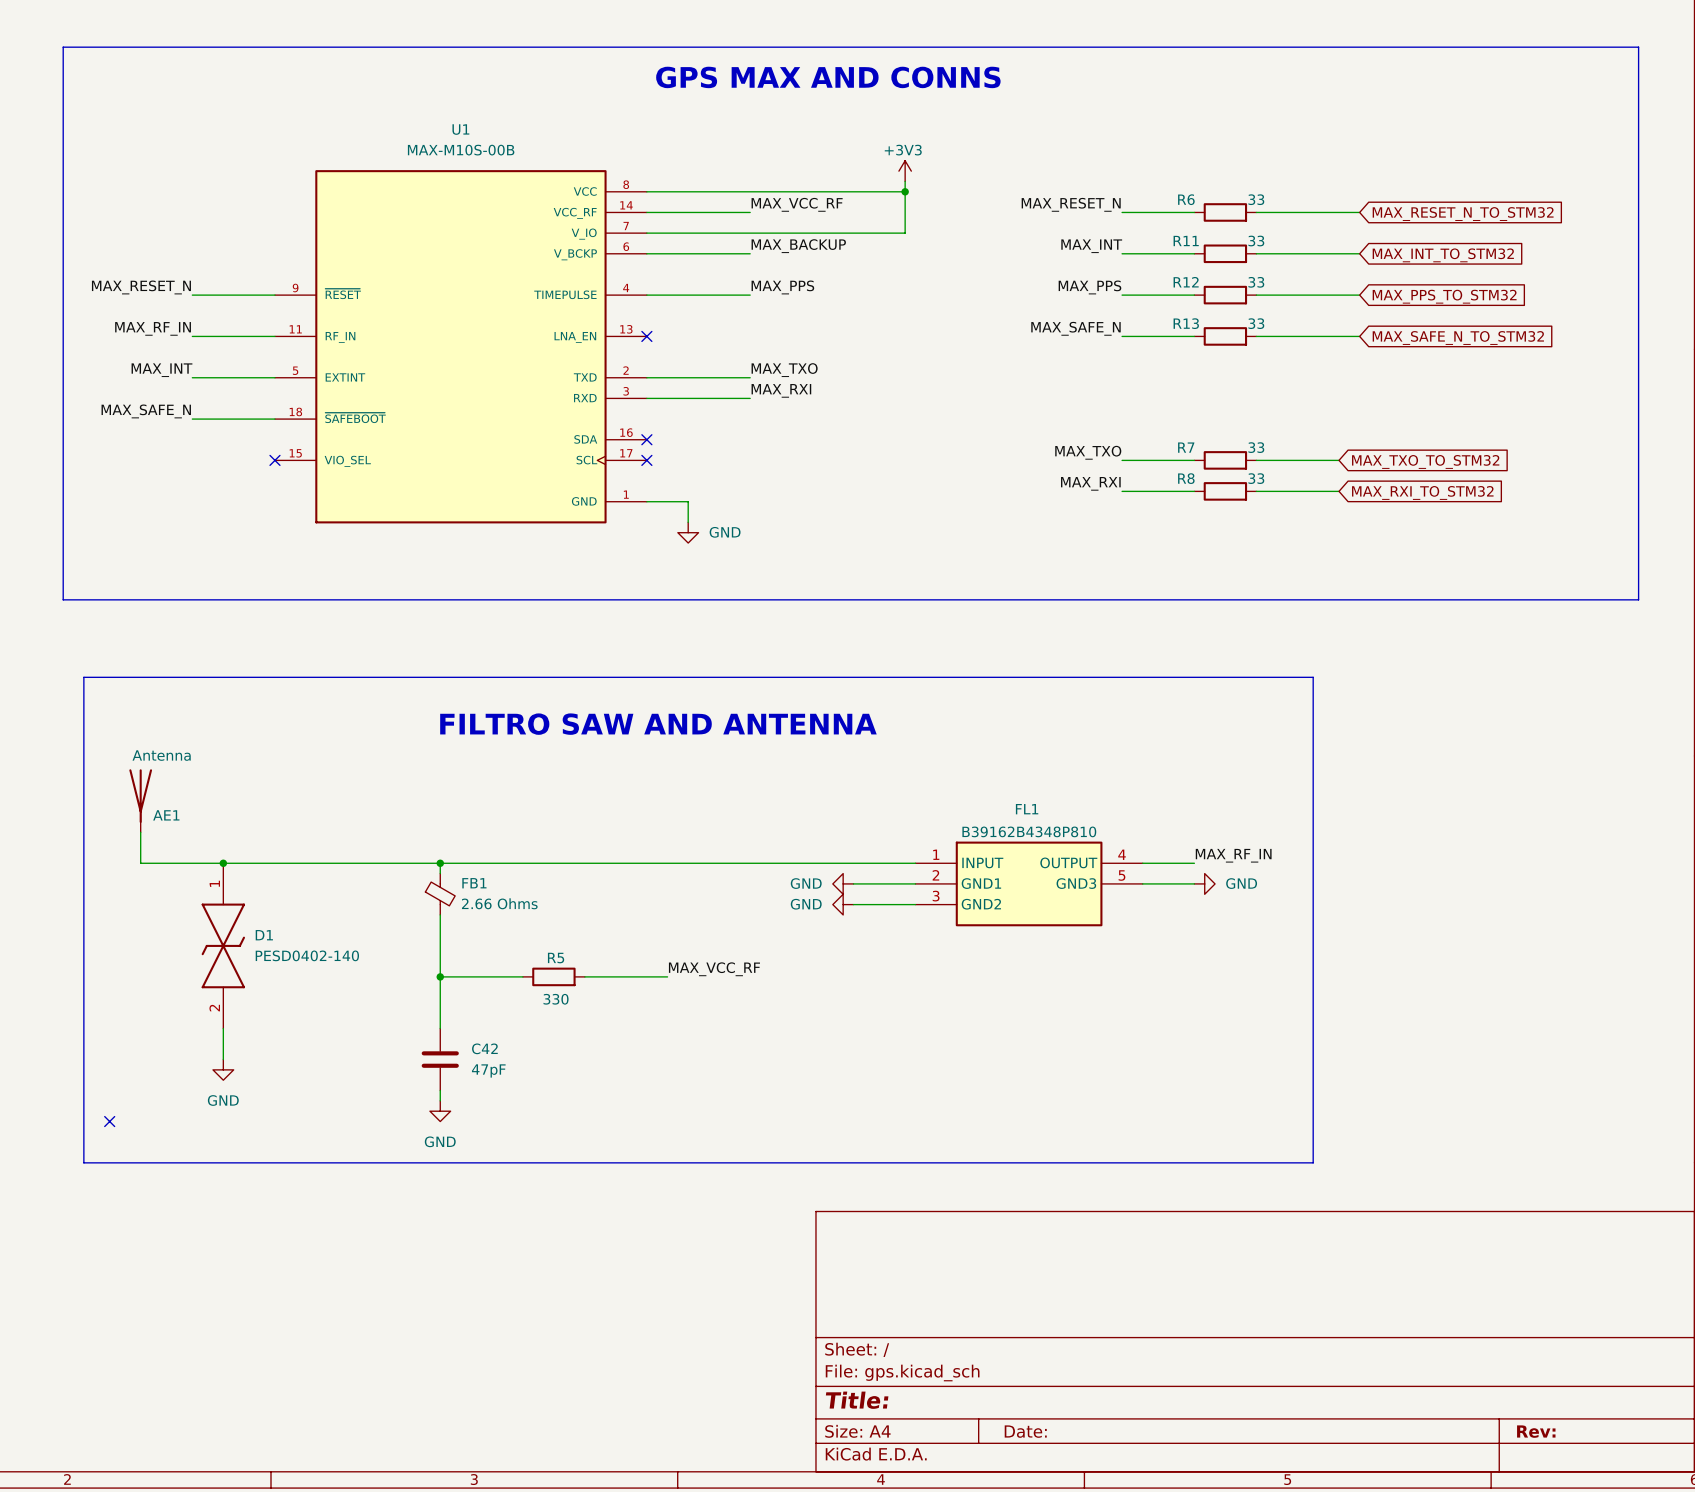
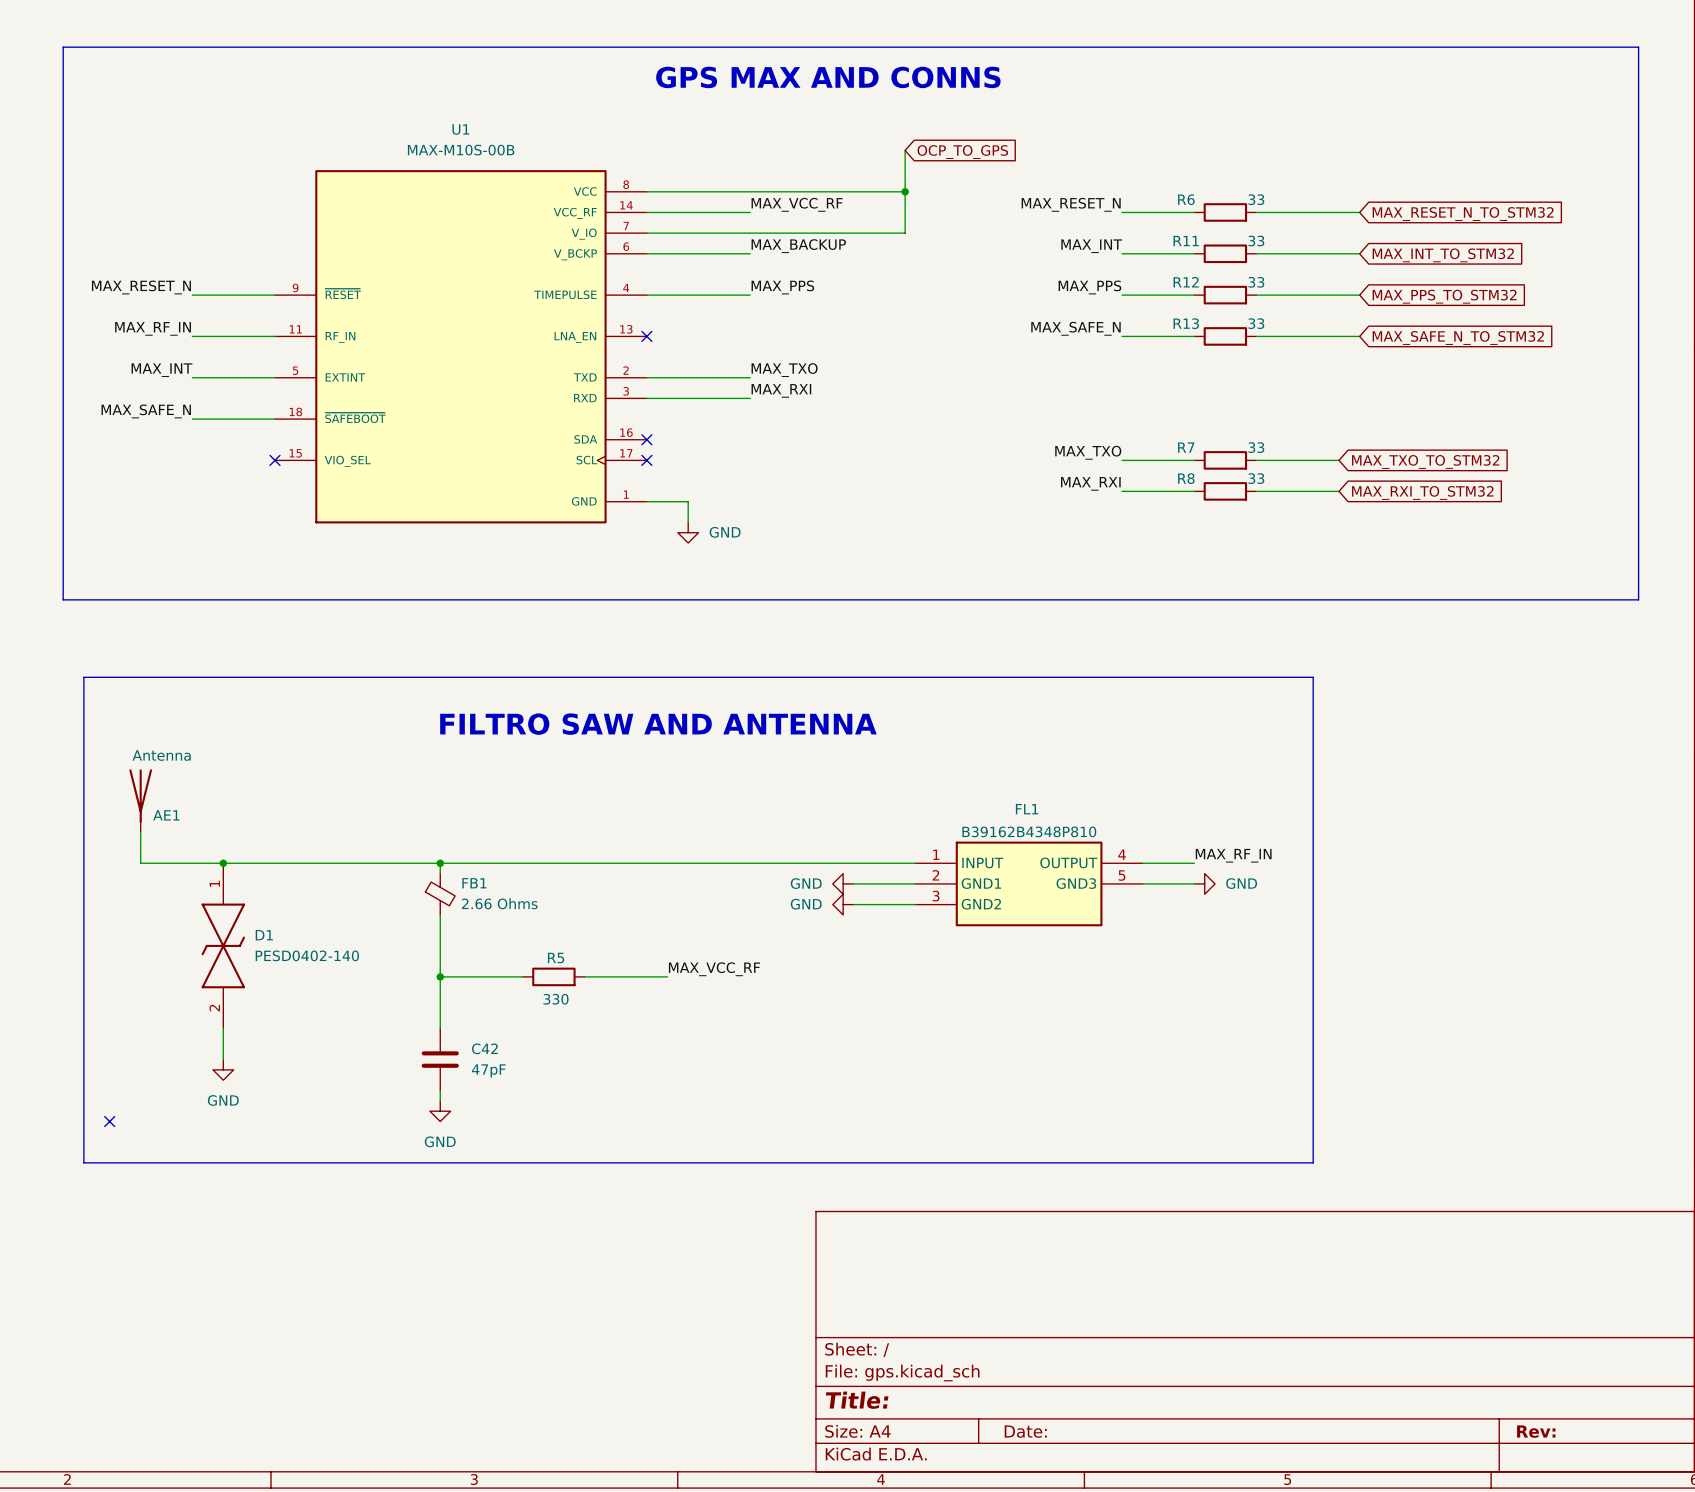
global label: none -> OCP_TO_GPS (962, 152)
power symbol: +3V3 (905, 171) -> none

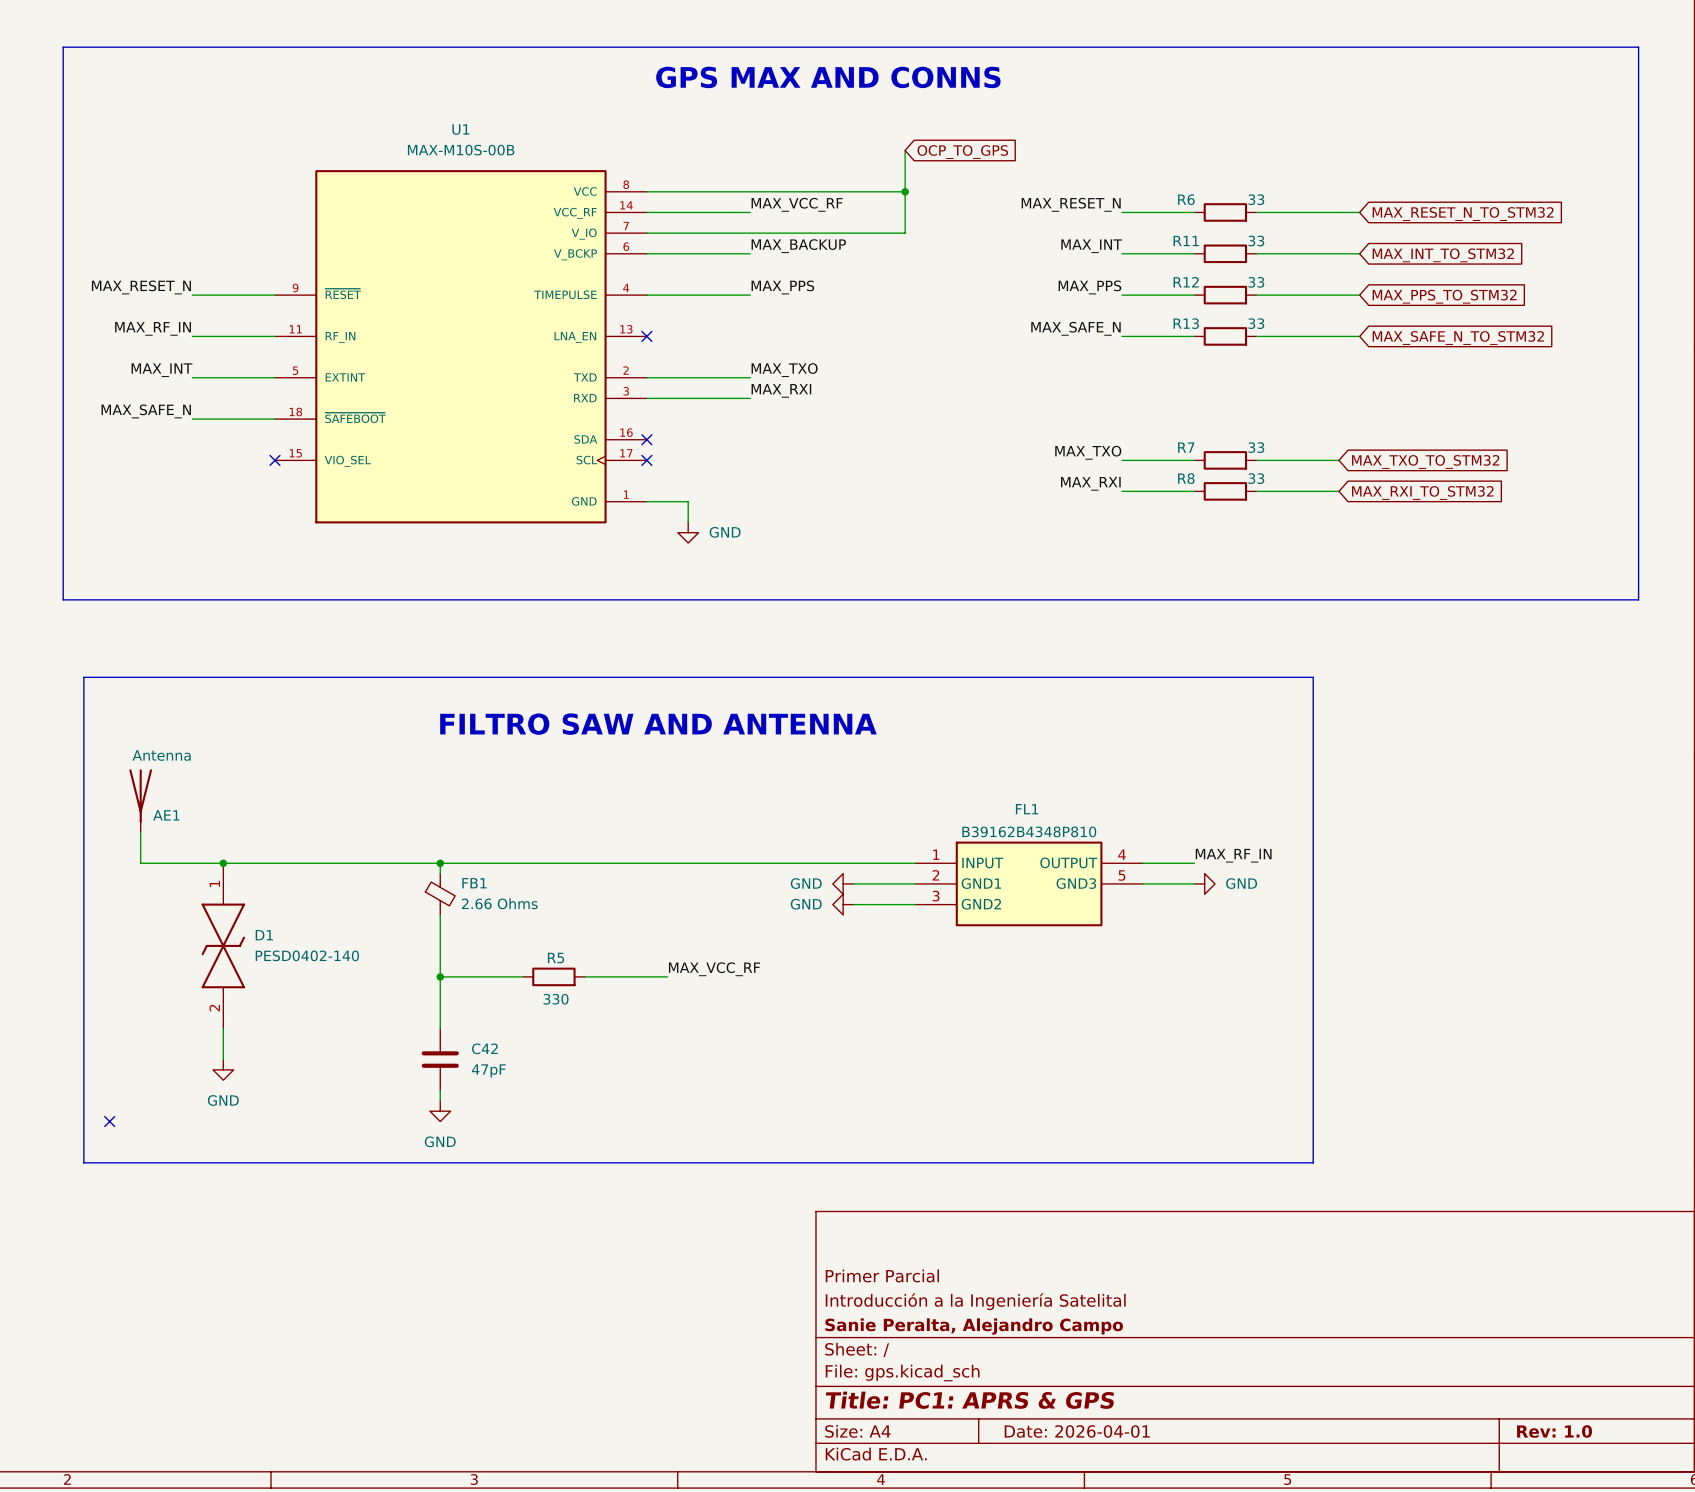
title block: none -> Primer Parcial (882, 1275)
title block: none -> Introducción a la Ingeniería Satelital (975, 1301)
title block: none -> Sanie Peralta, Alejandro Campo (974, 1326)
title block: Title: (857, 1400) -> Title: PC1: APRS & GPS (969, 1400)
title block: Date: (1025, 1431) -> Date: 2026-04-01 (1077, 1431)
title block: Rev: (1536, 1431) -> Rev: 1.0 (1554, 1431)

